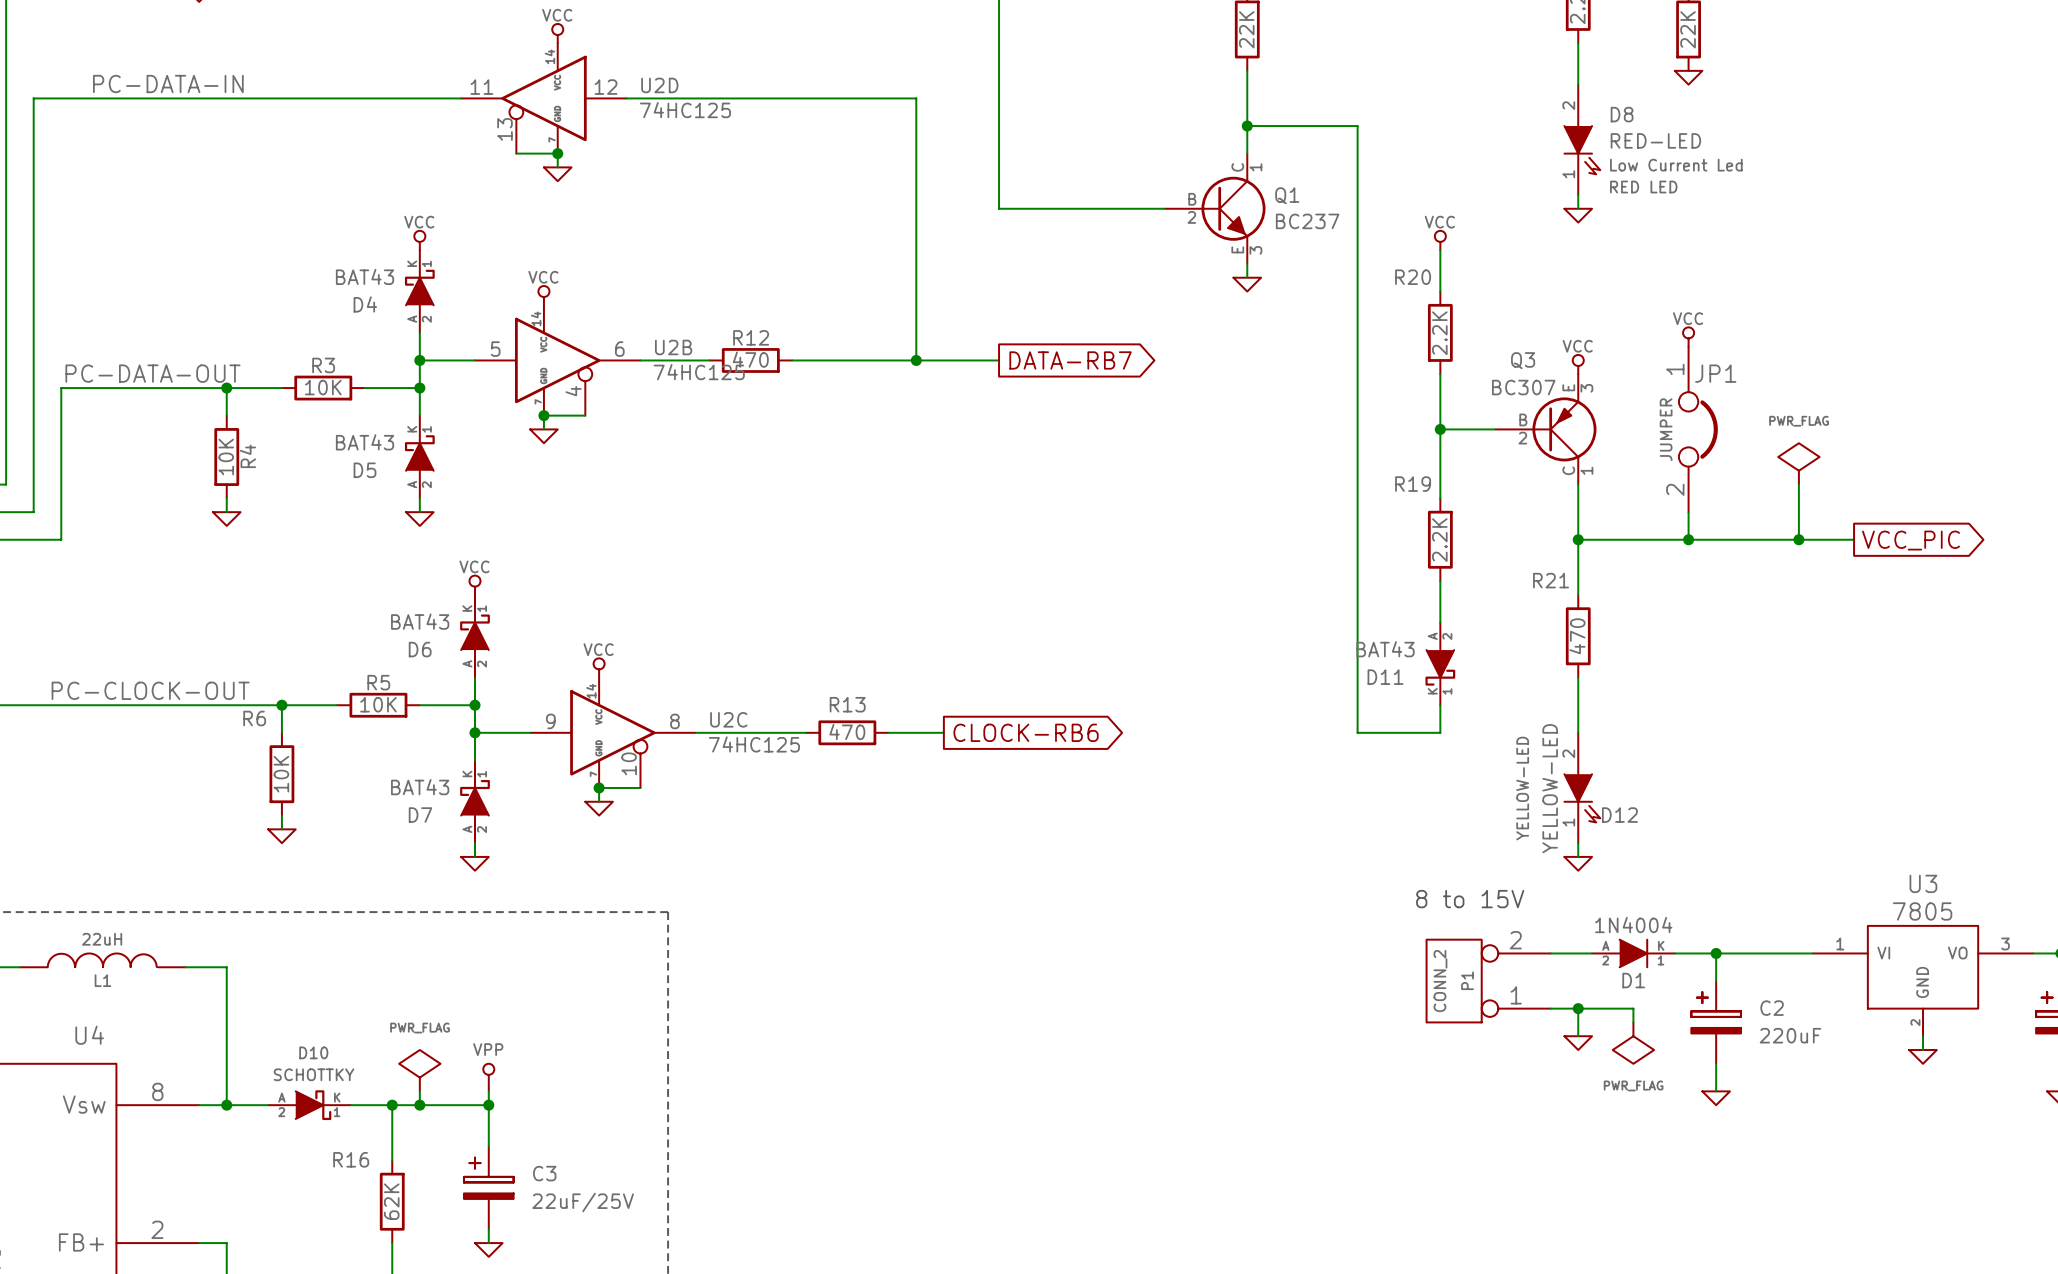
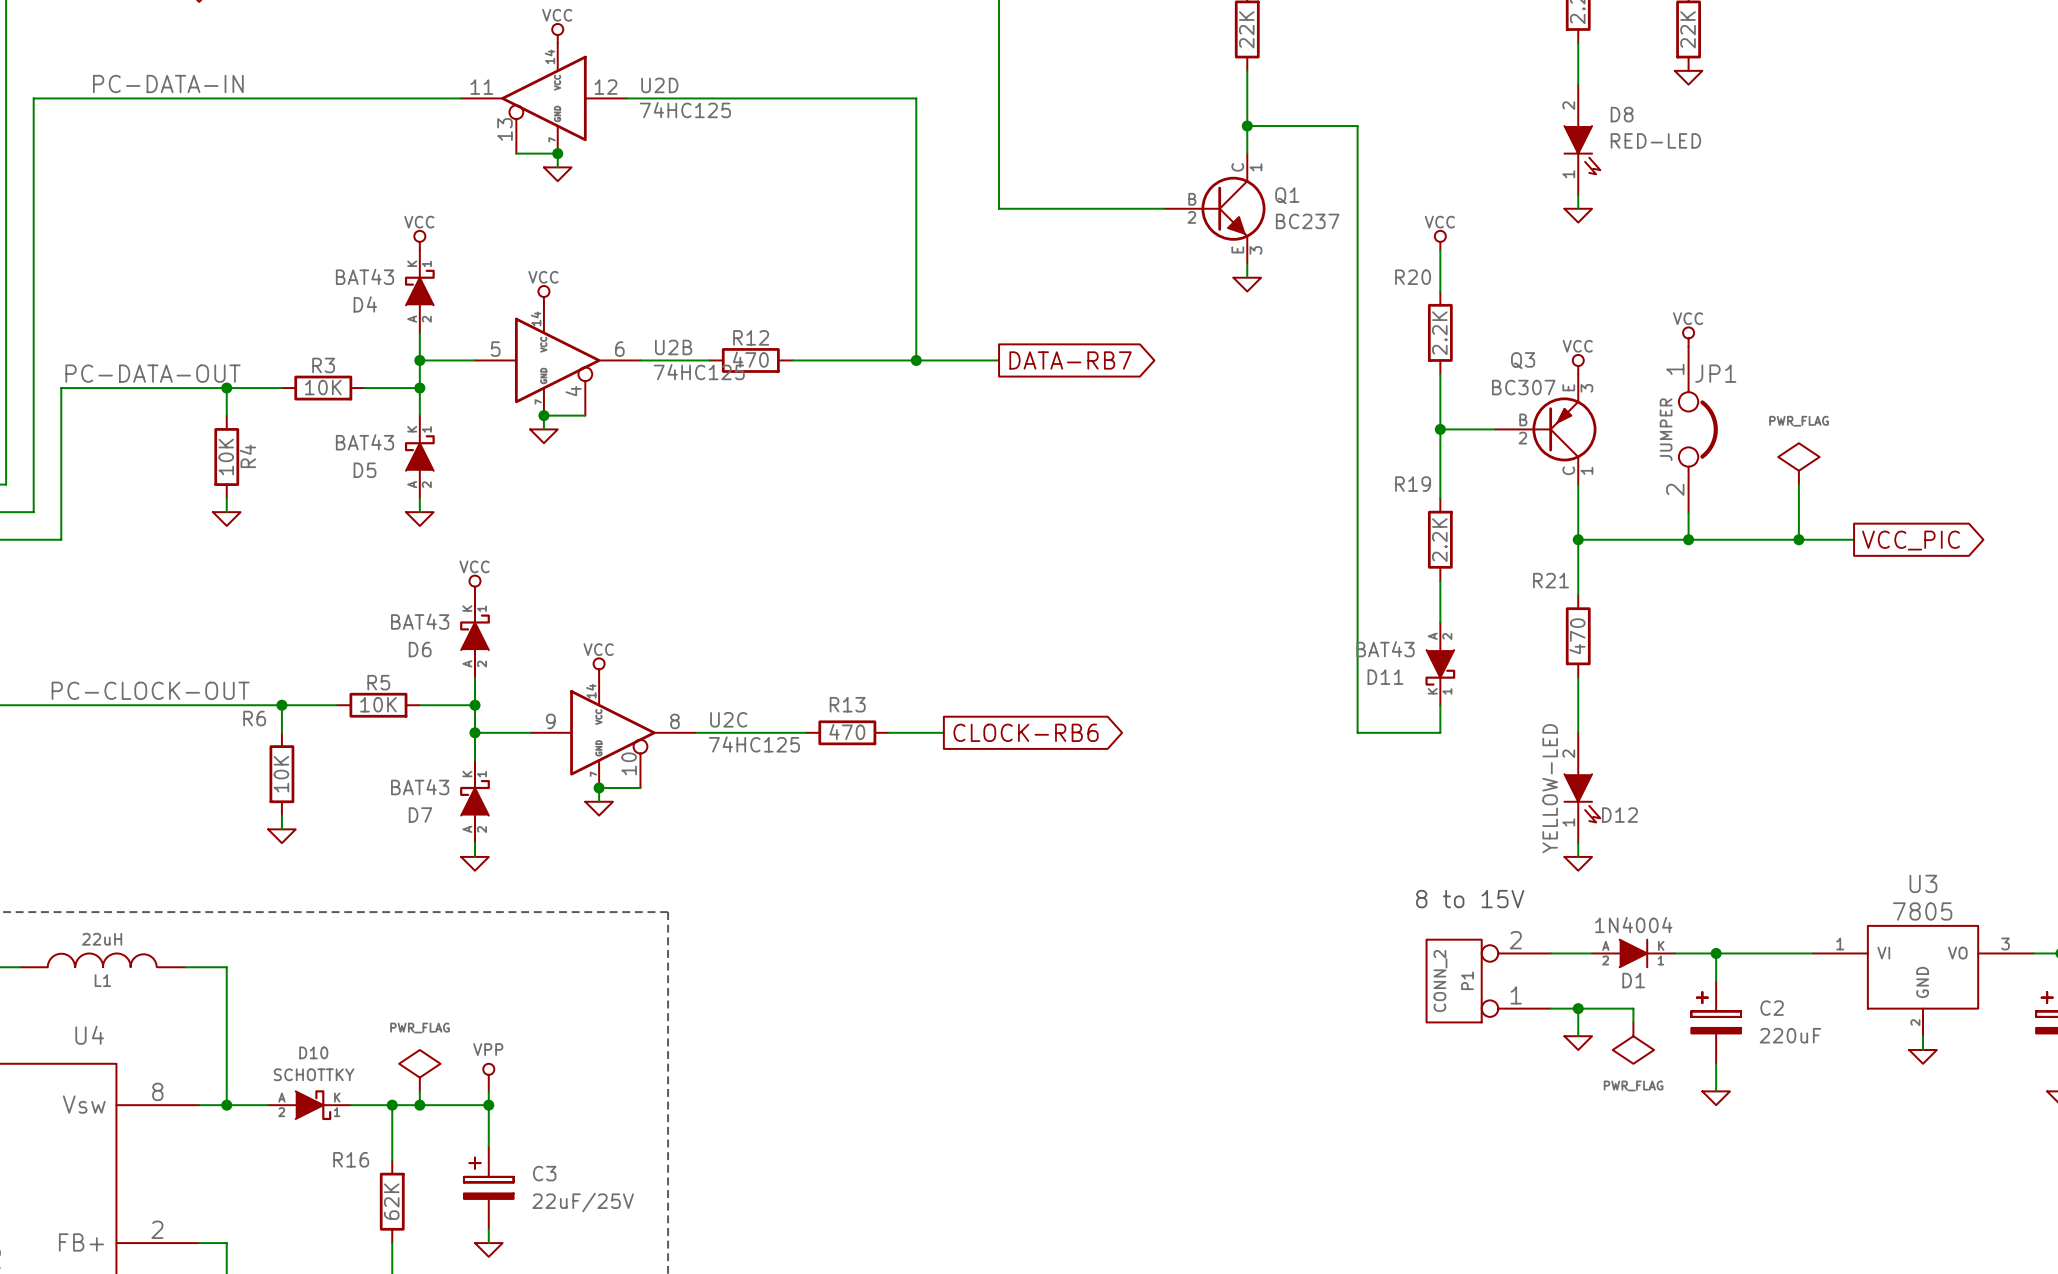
D8 text: Low Current Led (1676, 165) -> none
D8 text: RED LED (1643, 187) -> none
D12 text: YELLOW-LED (1522, 788) -> none

